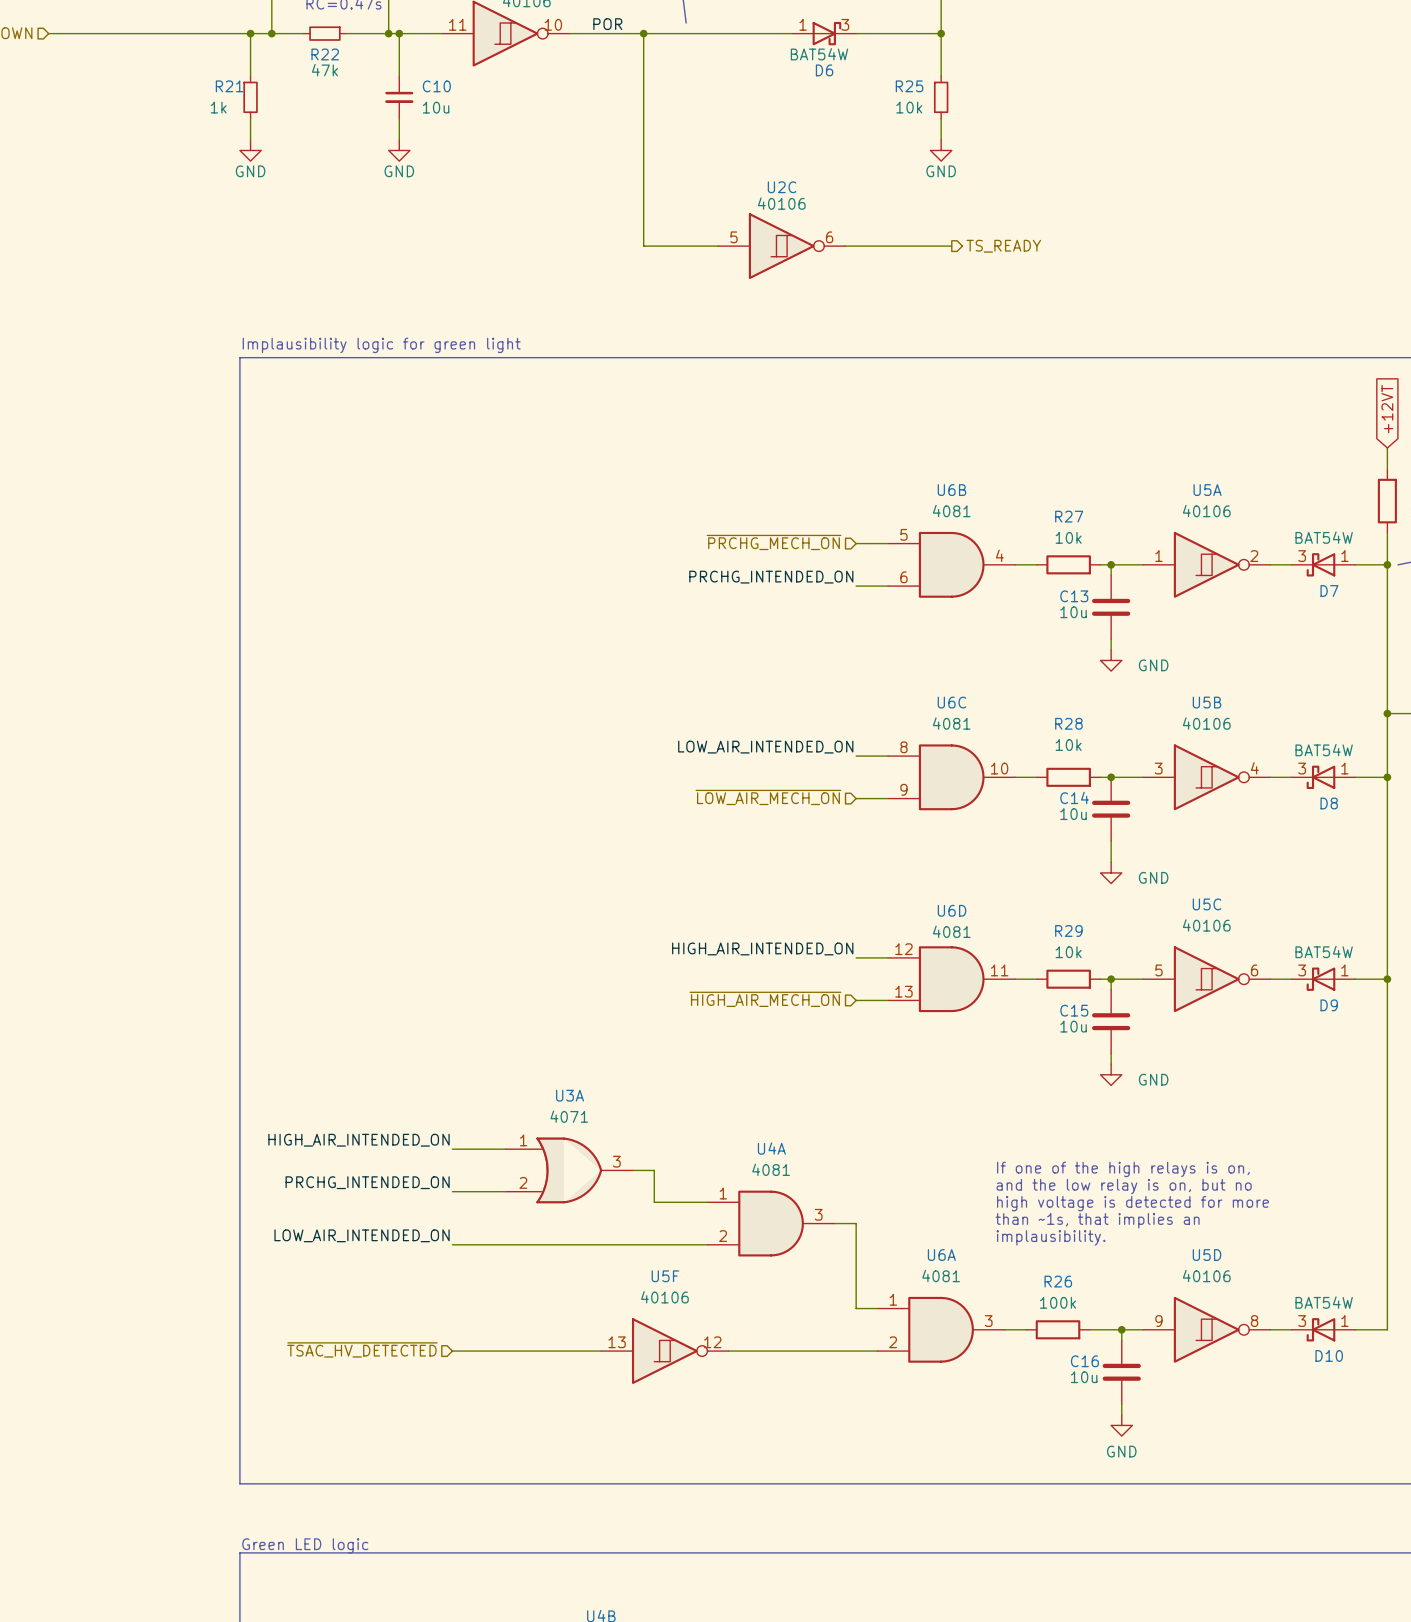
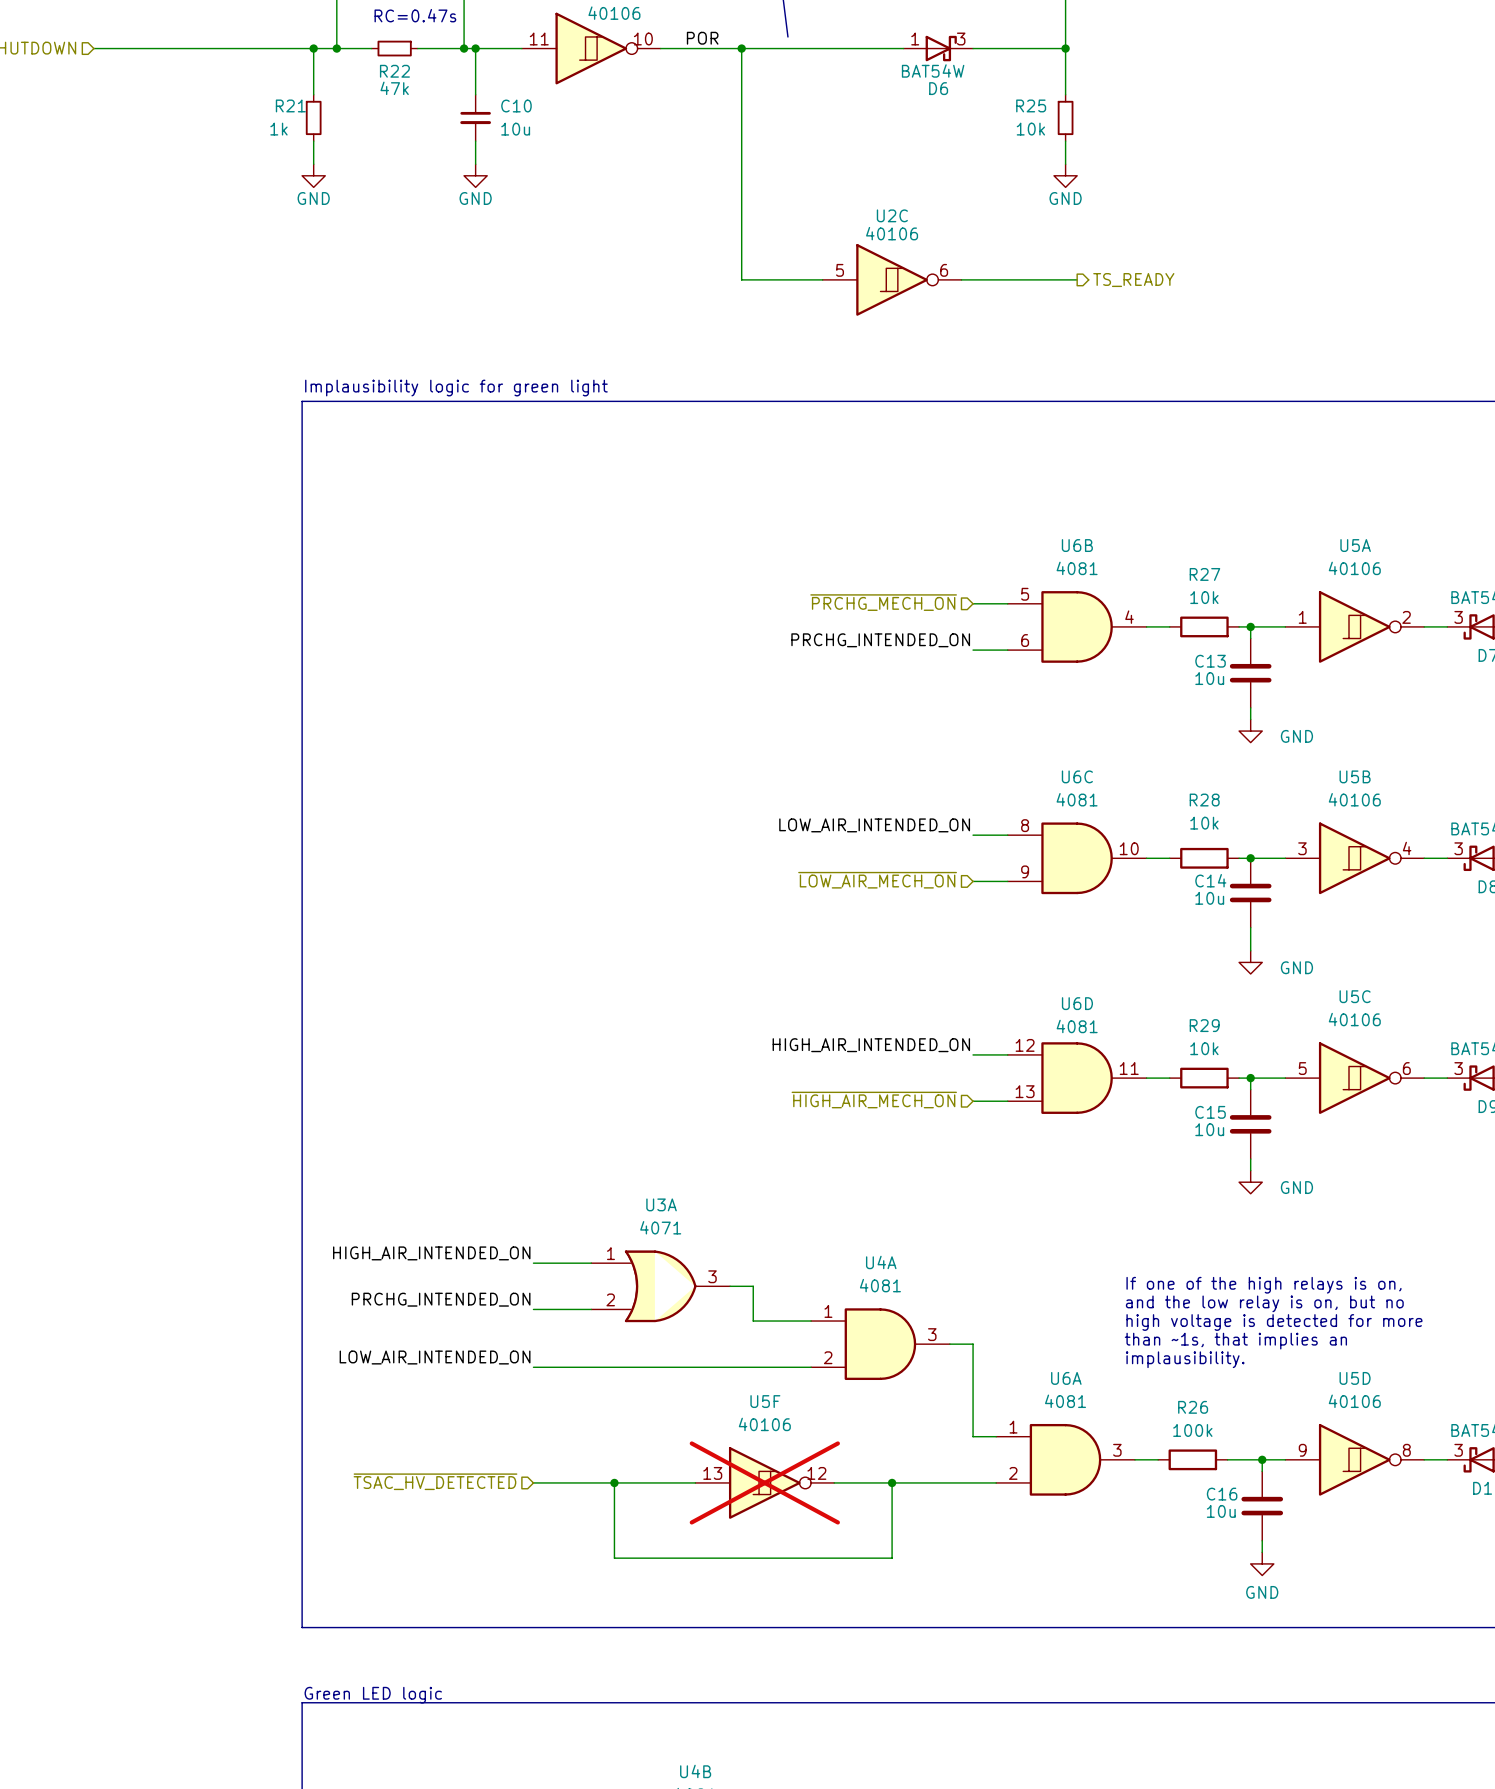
wire: none -> (614, 1482) (614, 1558) (892, 1558) (892, 1482)
junction: none -> (614, 1482)
U5F do-not-place cross: none -> (764, 1482)
junction: none -> (892, 1482)

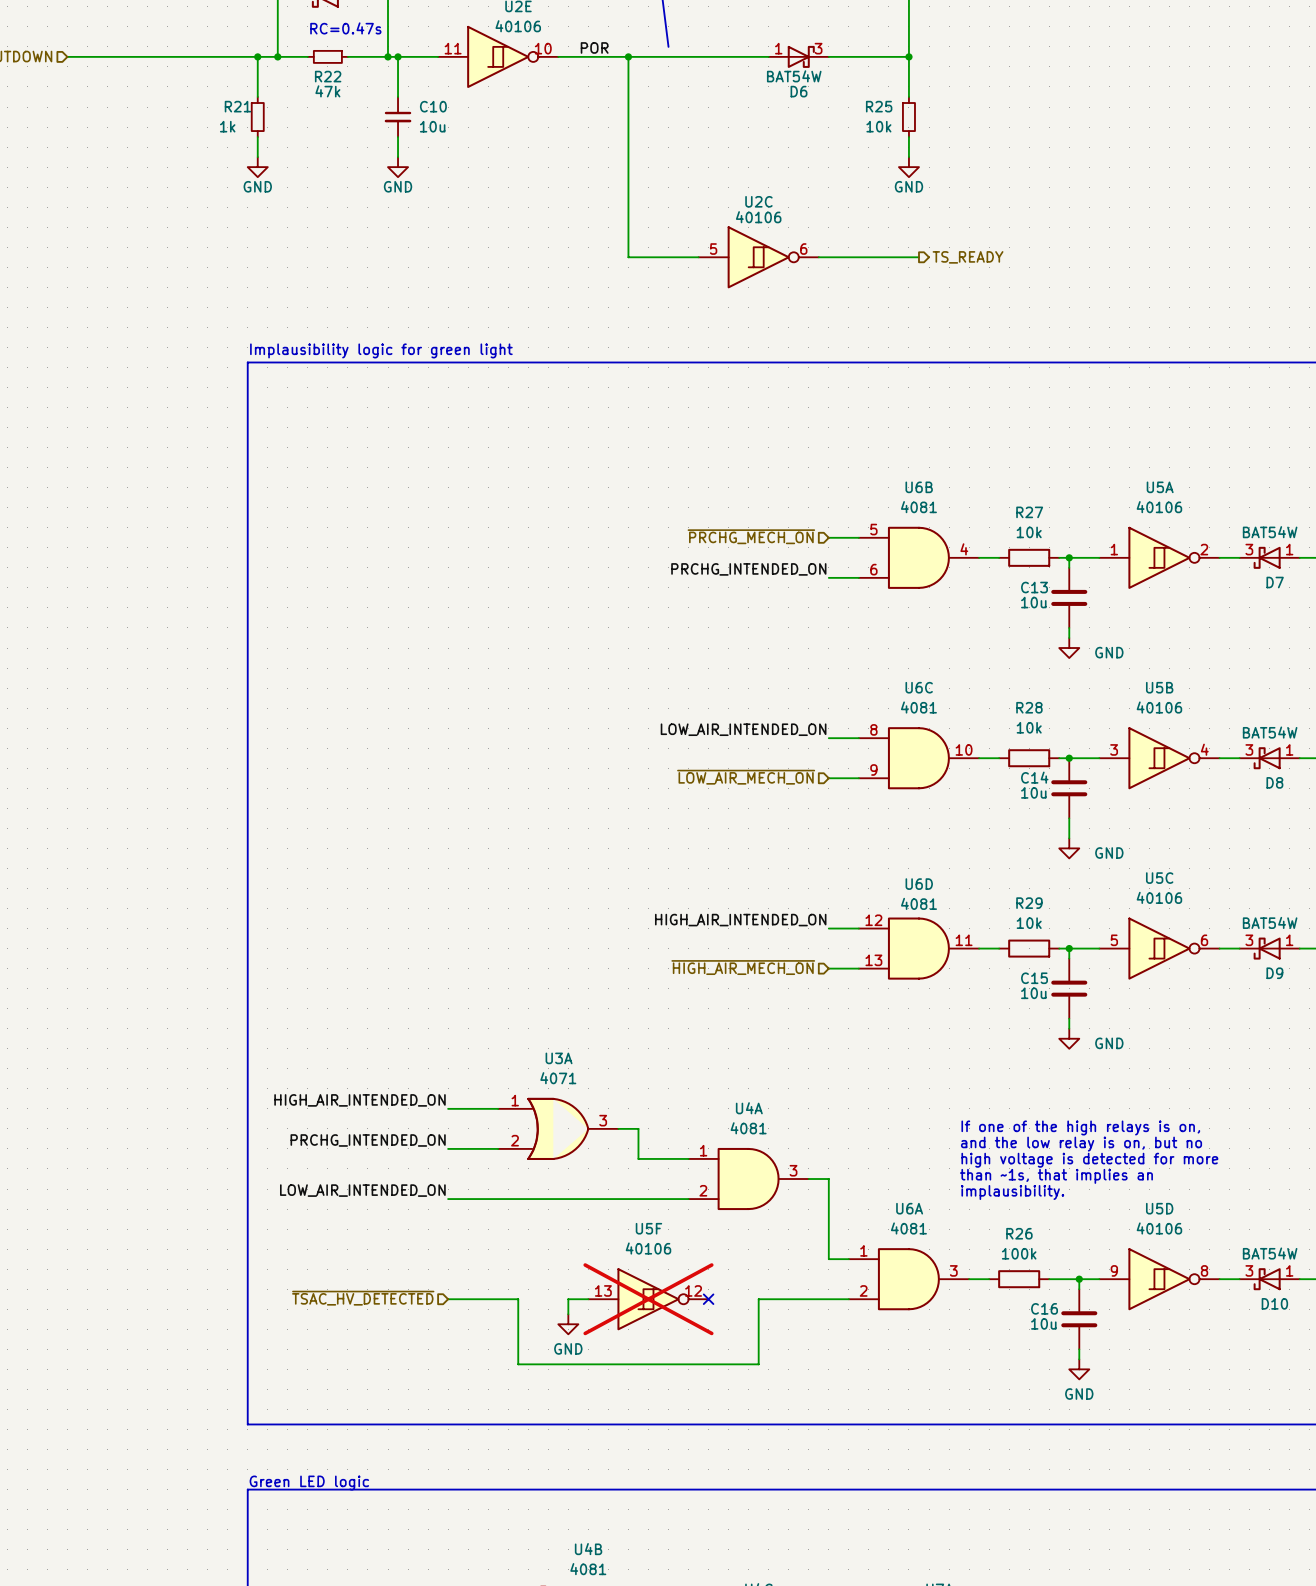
wire: (614, 1482) (672, 1482) -> (568, 1314) (568, 1299)
junction: (614, 1482) -> none
wire: (834, 1482) (892, 1482) -> none
no-connect mark: none -> (708, 1299)
junction: (892, 1482) -> none
power symbol: none -> GND (568, 1324)

